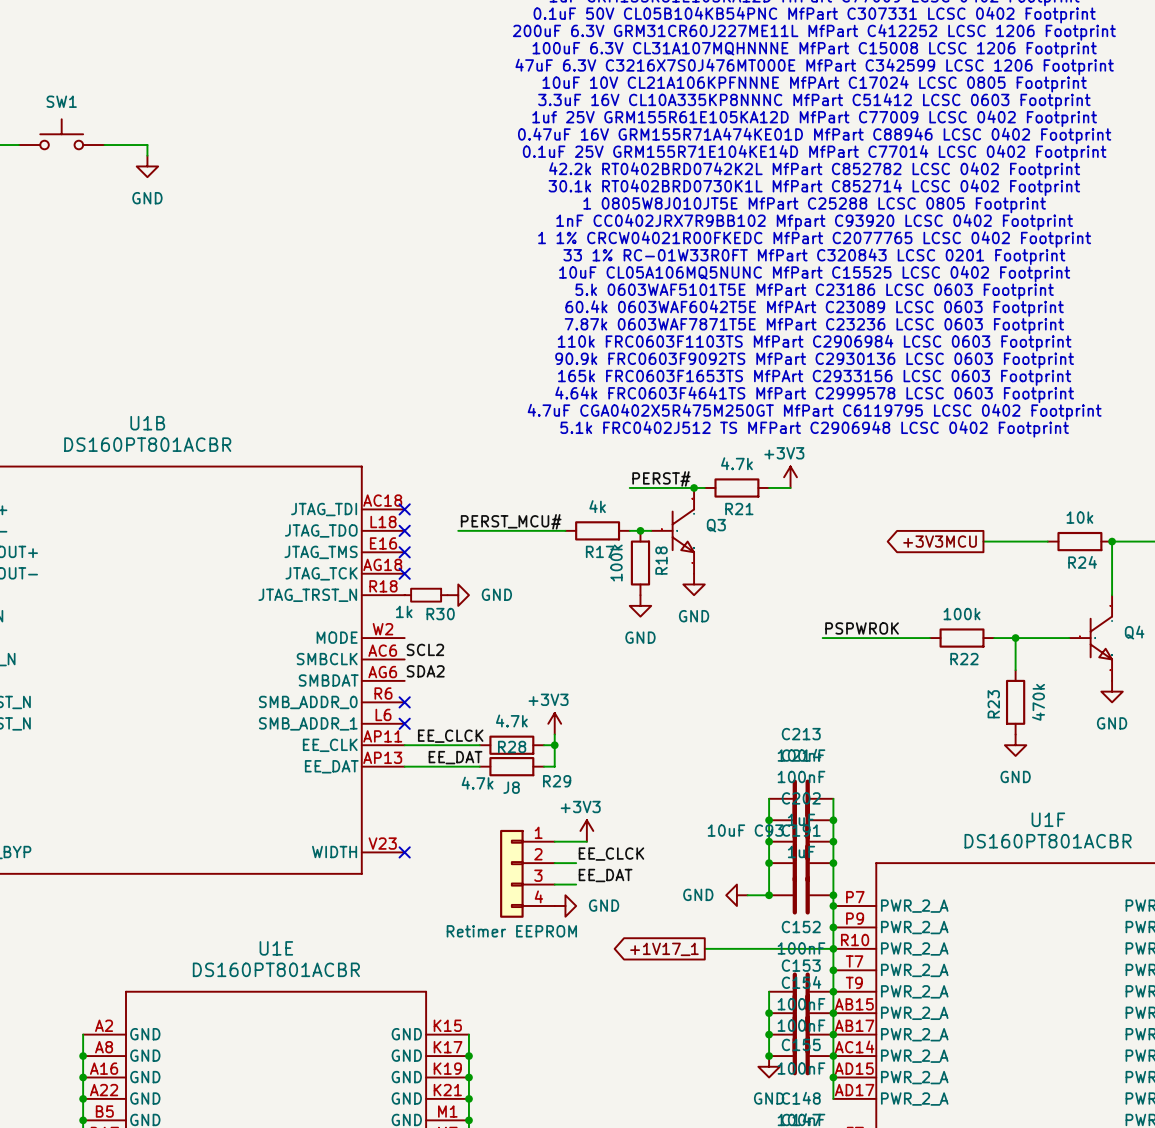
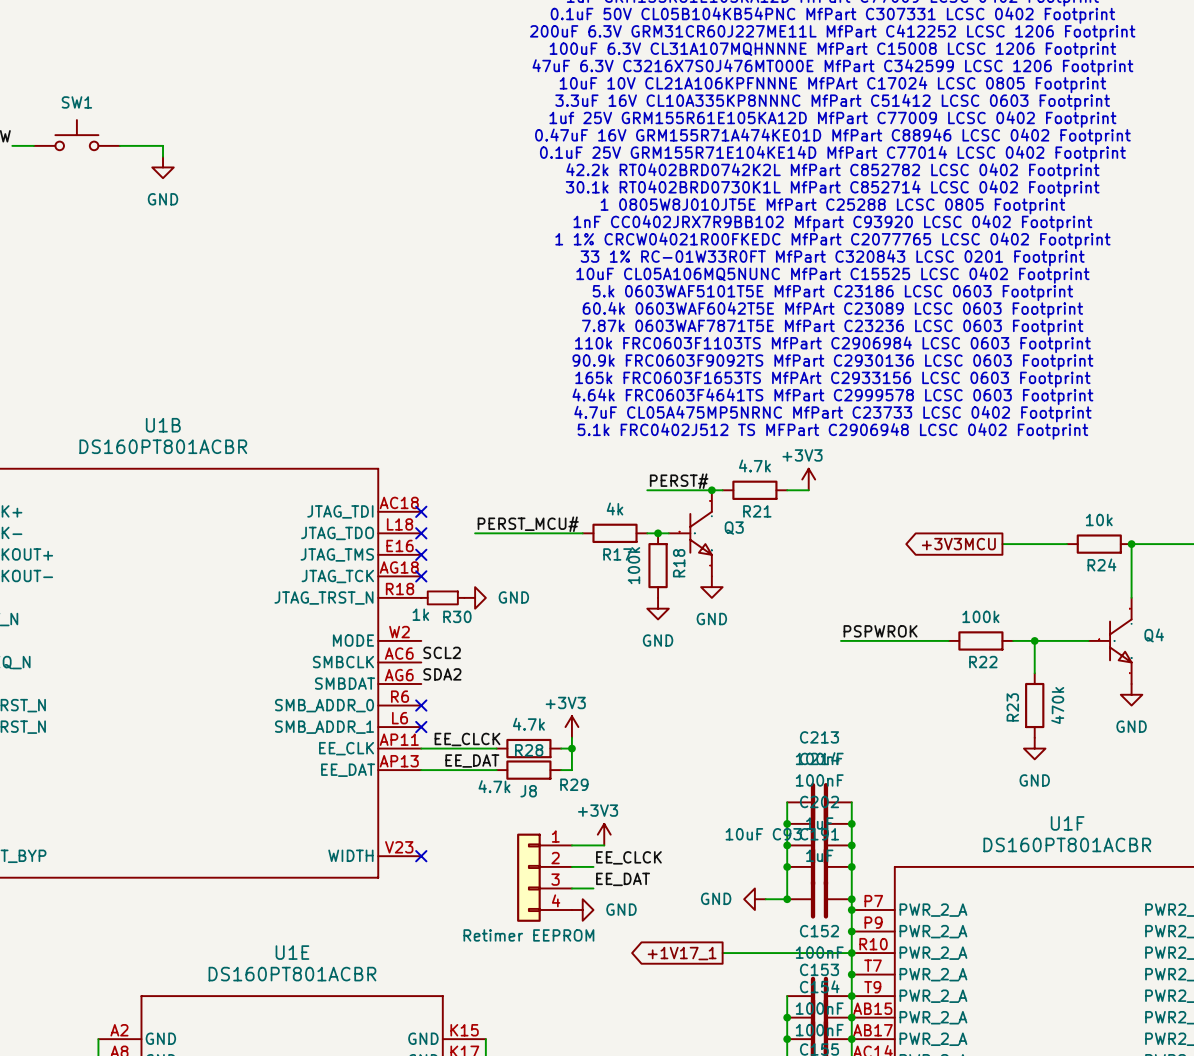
text: 4.7uF CGA0402X5R475M250GT MfPart C6119795 LCSC 0402 Footprint (814, 412) -> 4.7uF CL05A475MP5NRNC MfPart C23733 LCSC 0402 Footprint (832, 414)

